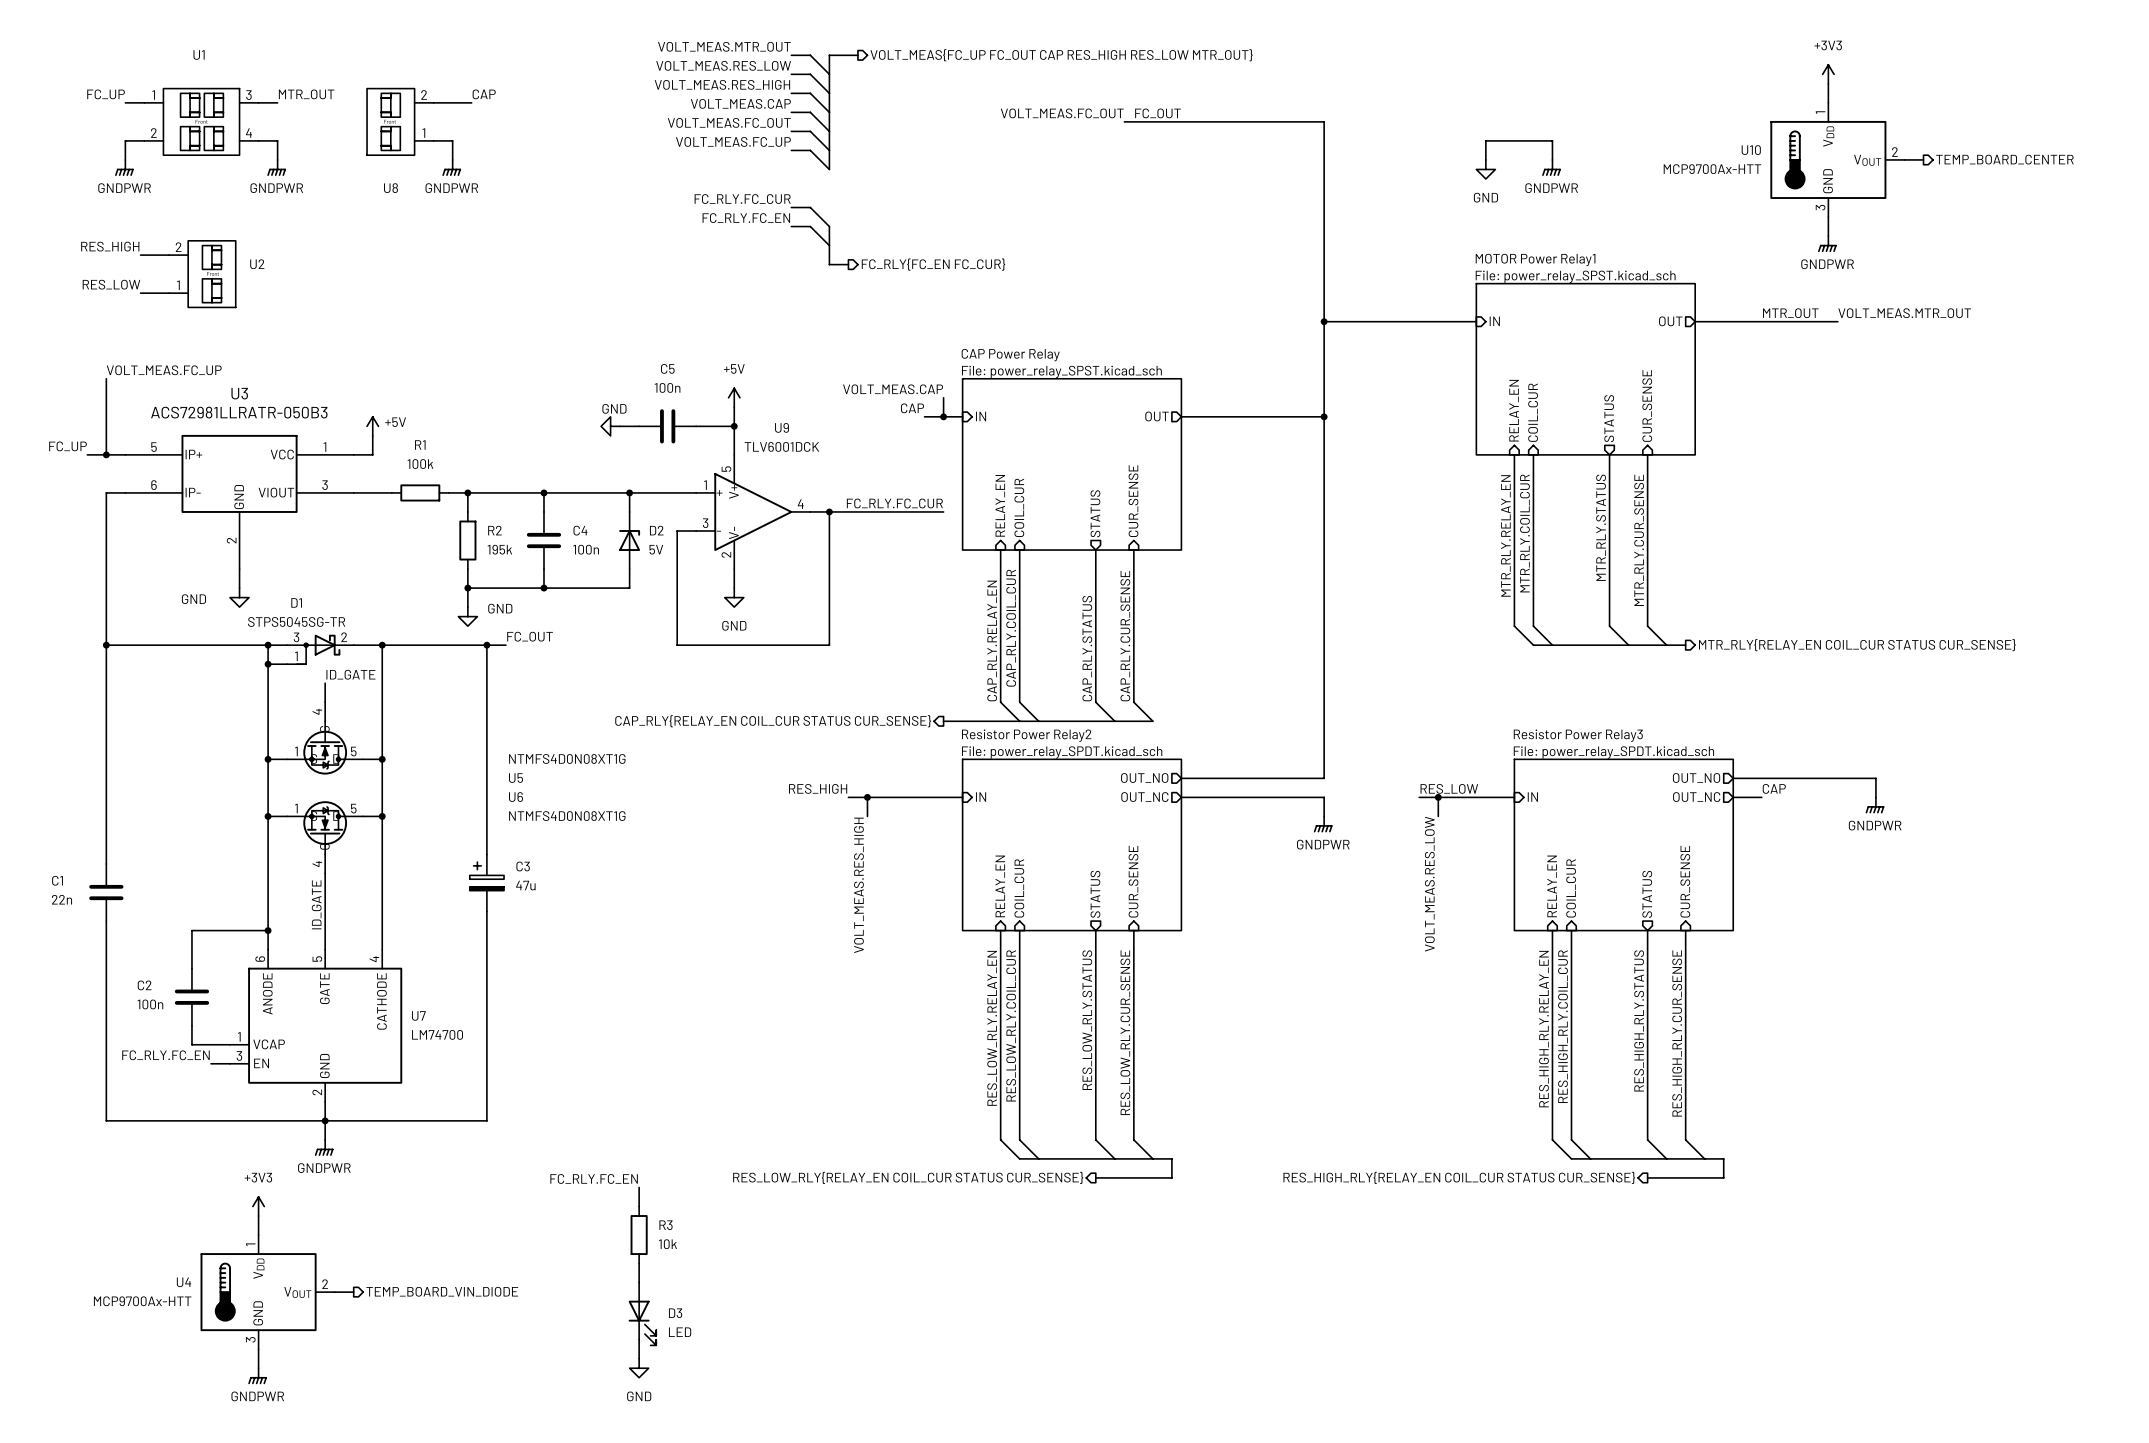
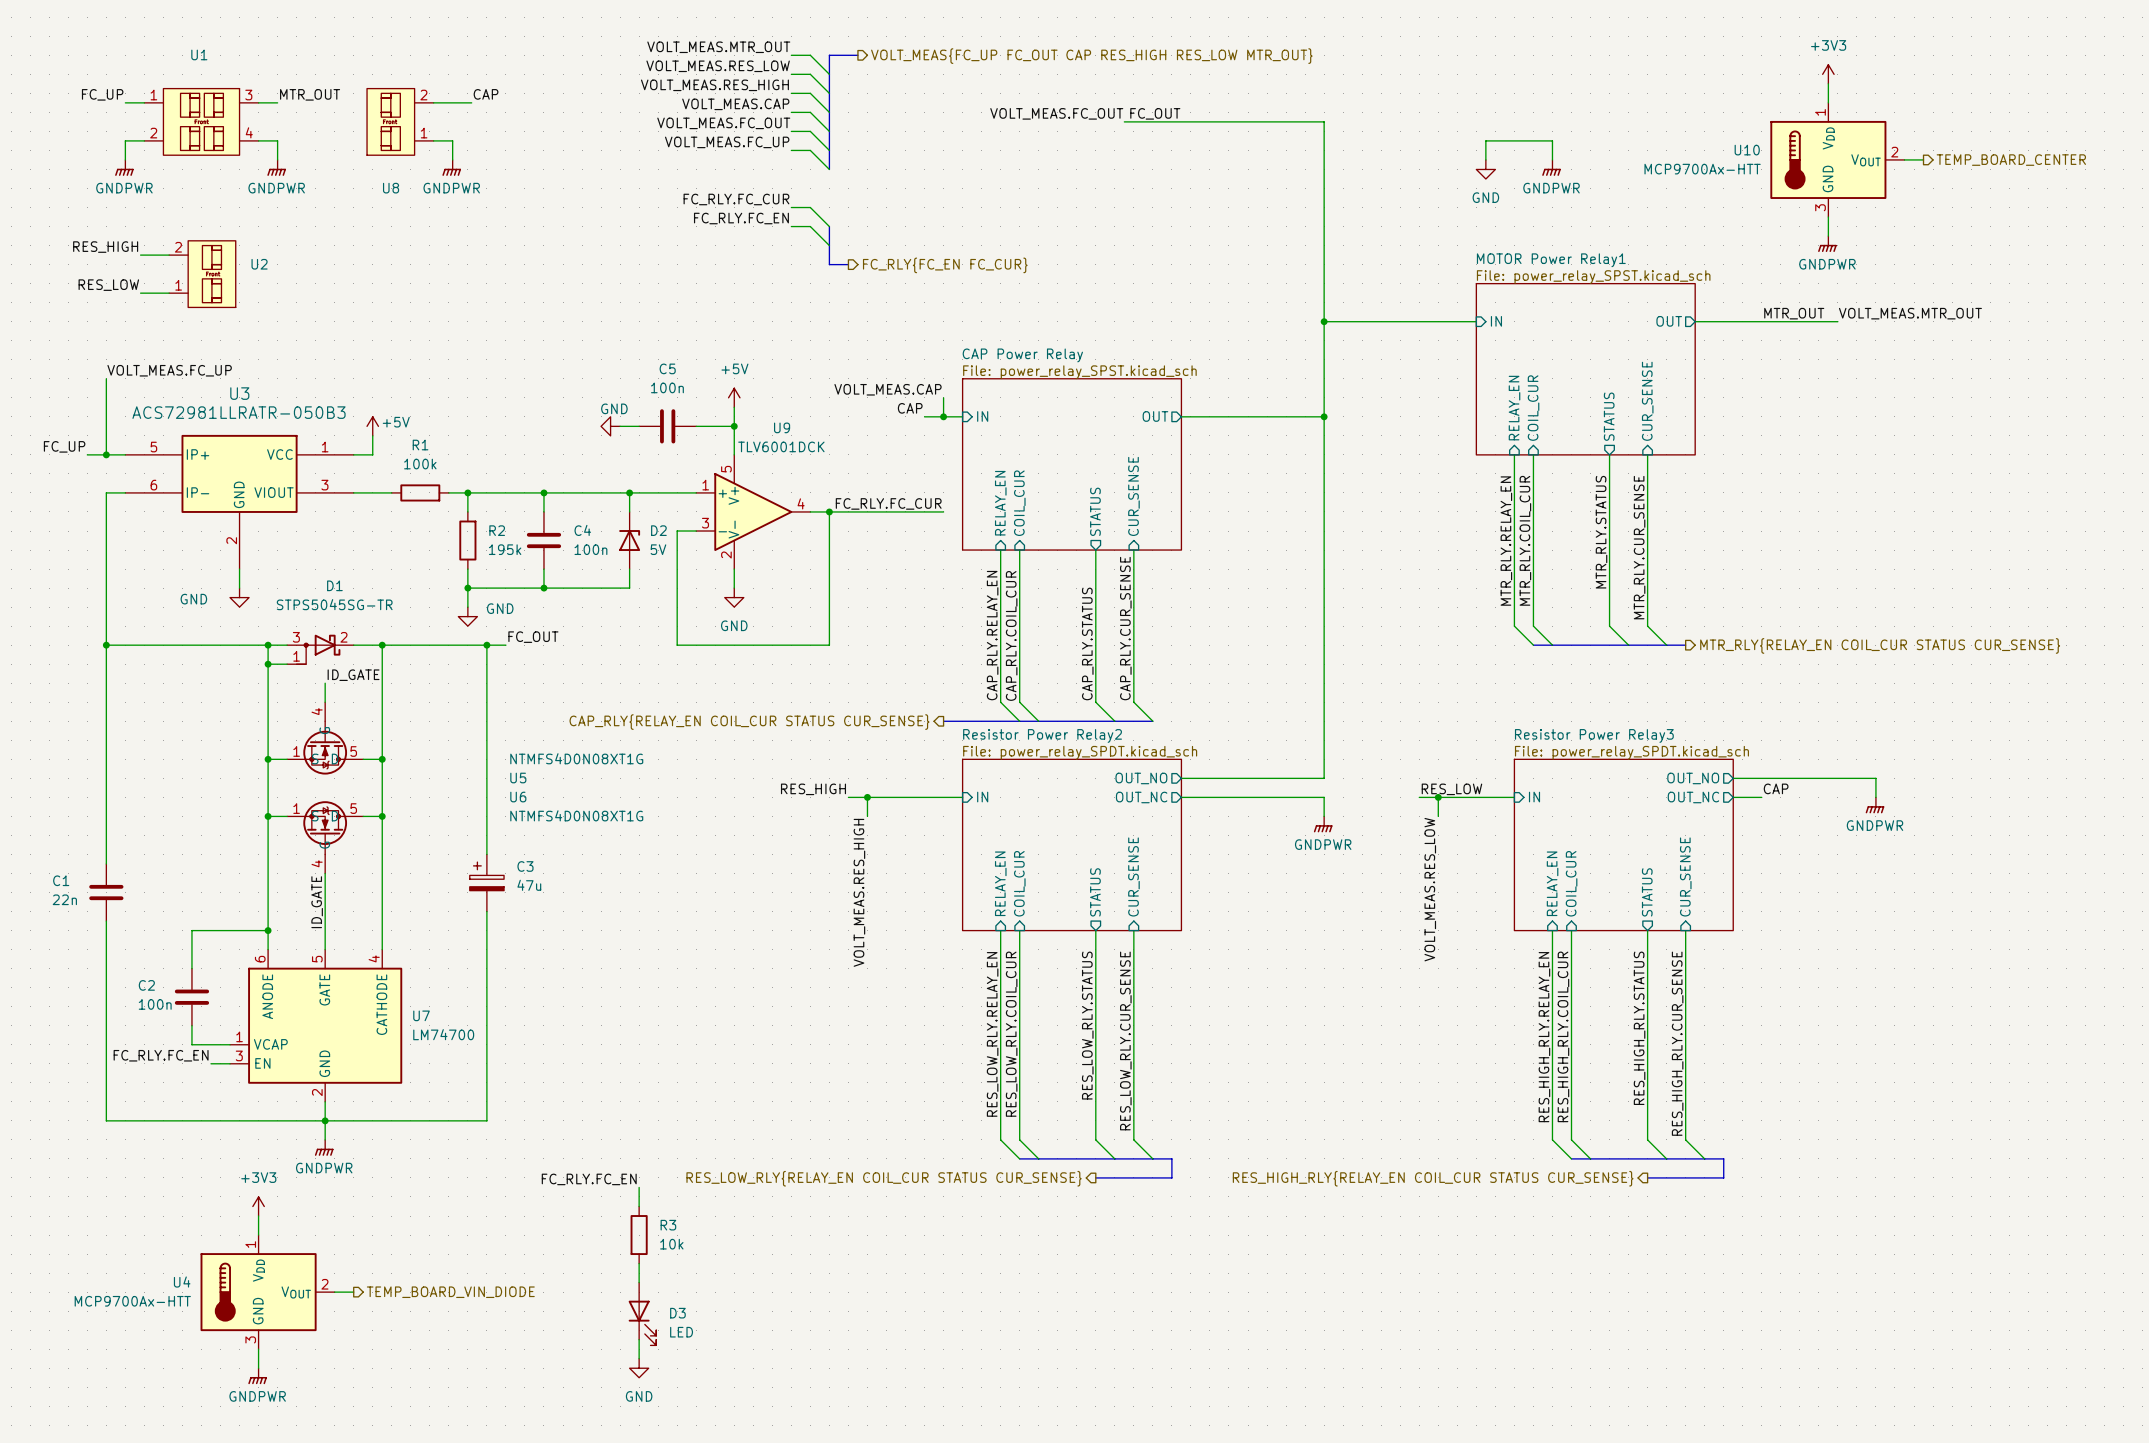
D1 name position: D1 (296, 602) -> D1 (334, 585)
D1 value position: STPS5045SG-TR (296, 621) -> STPS5045SG-TR (334, 604)

